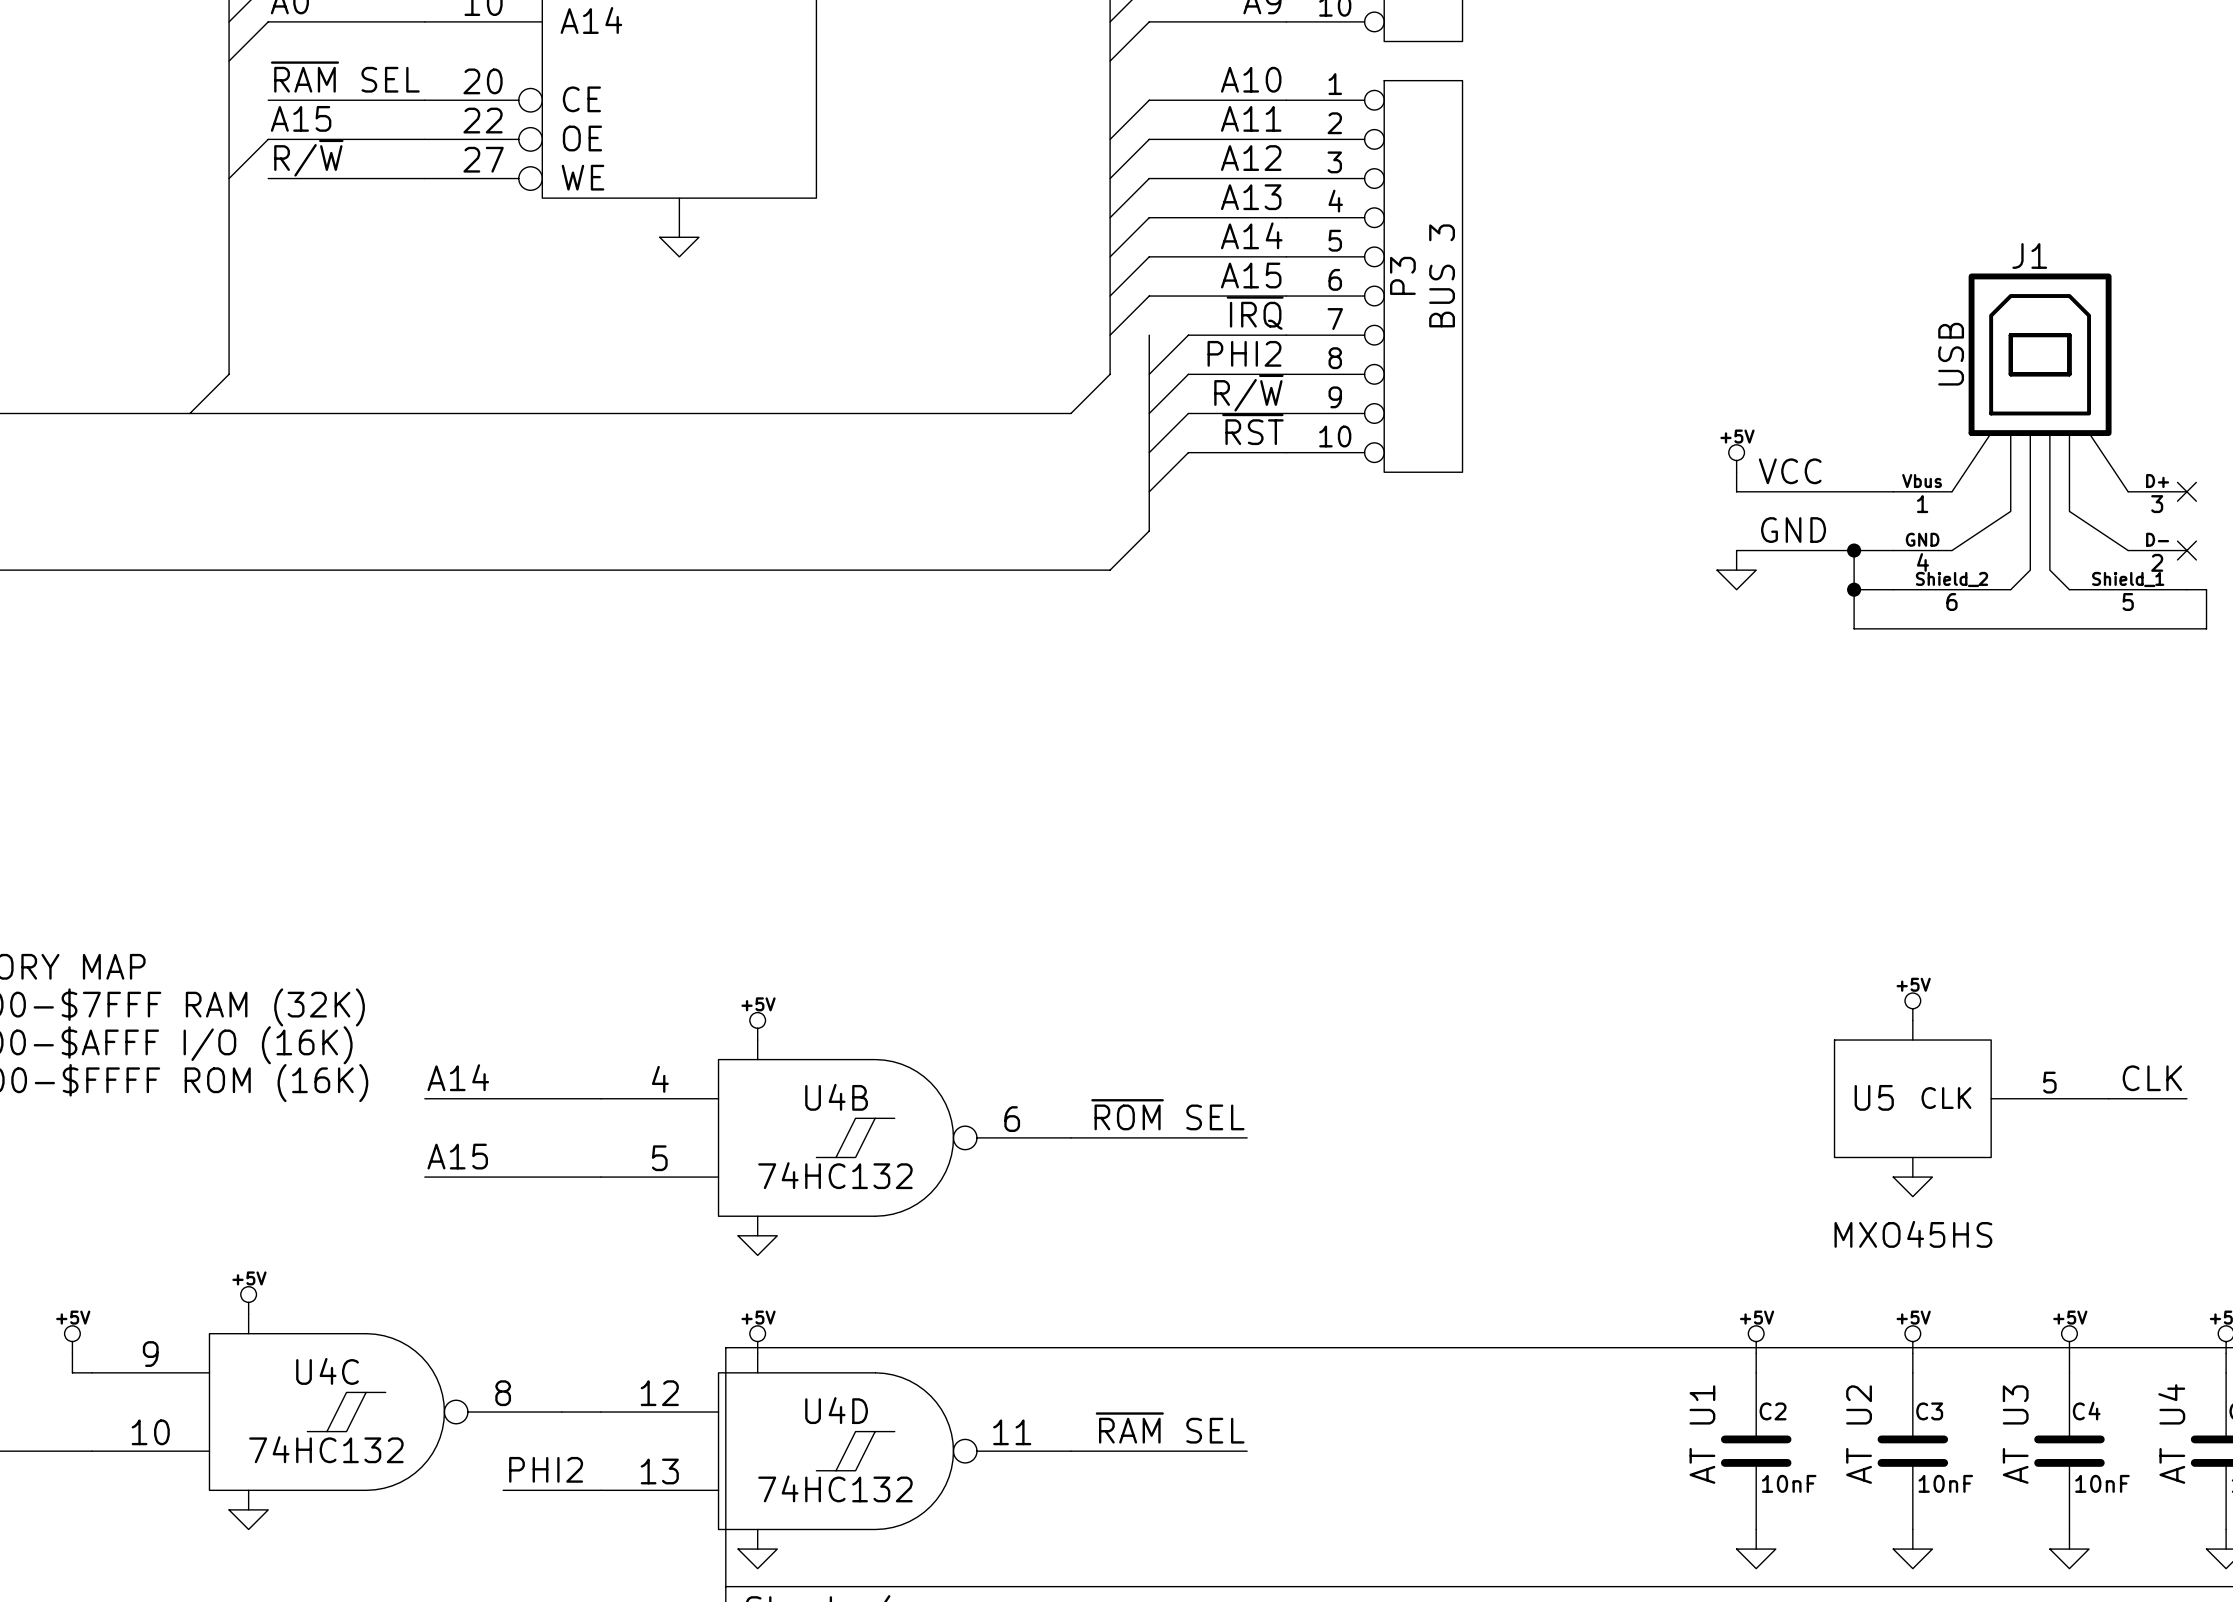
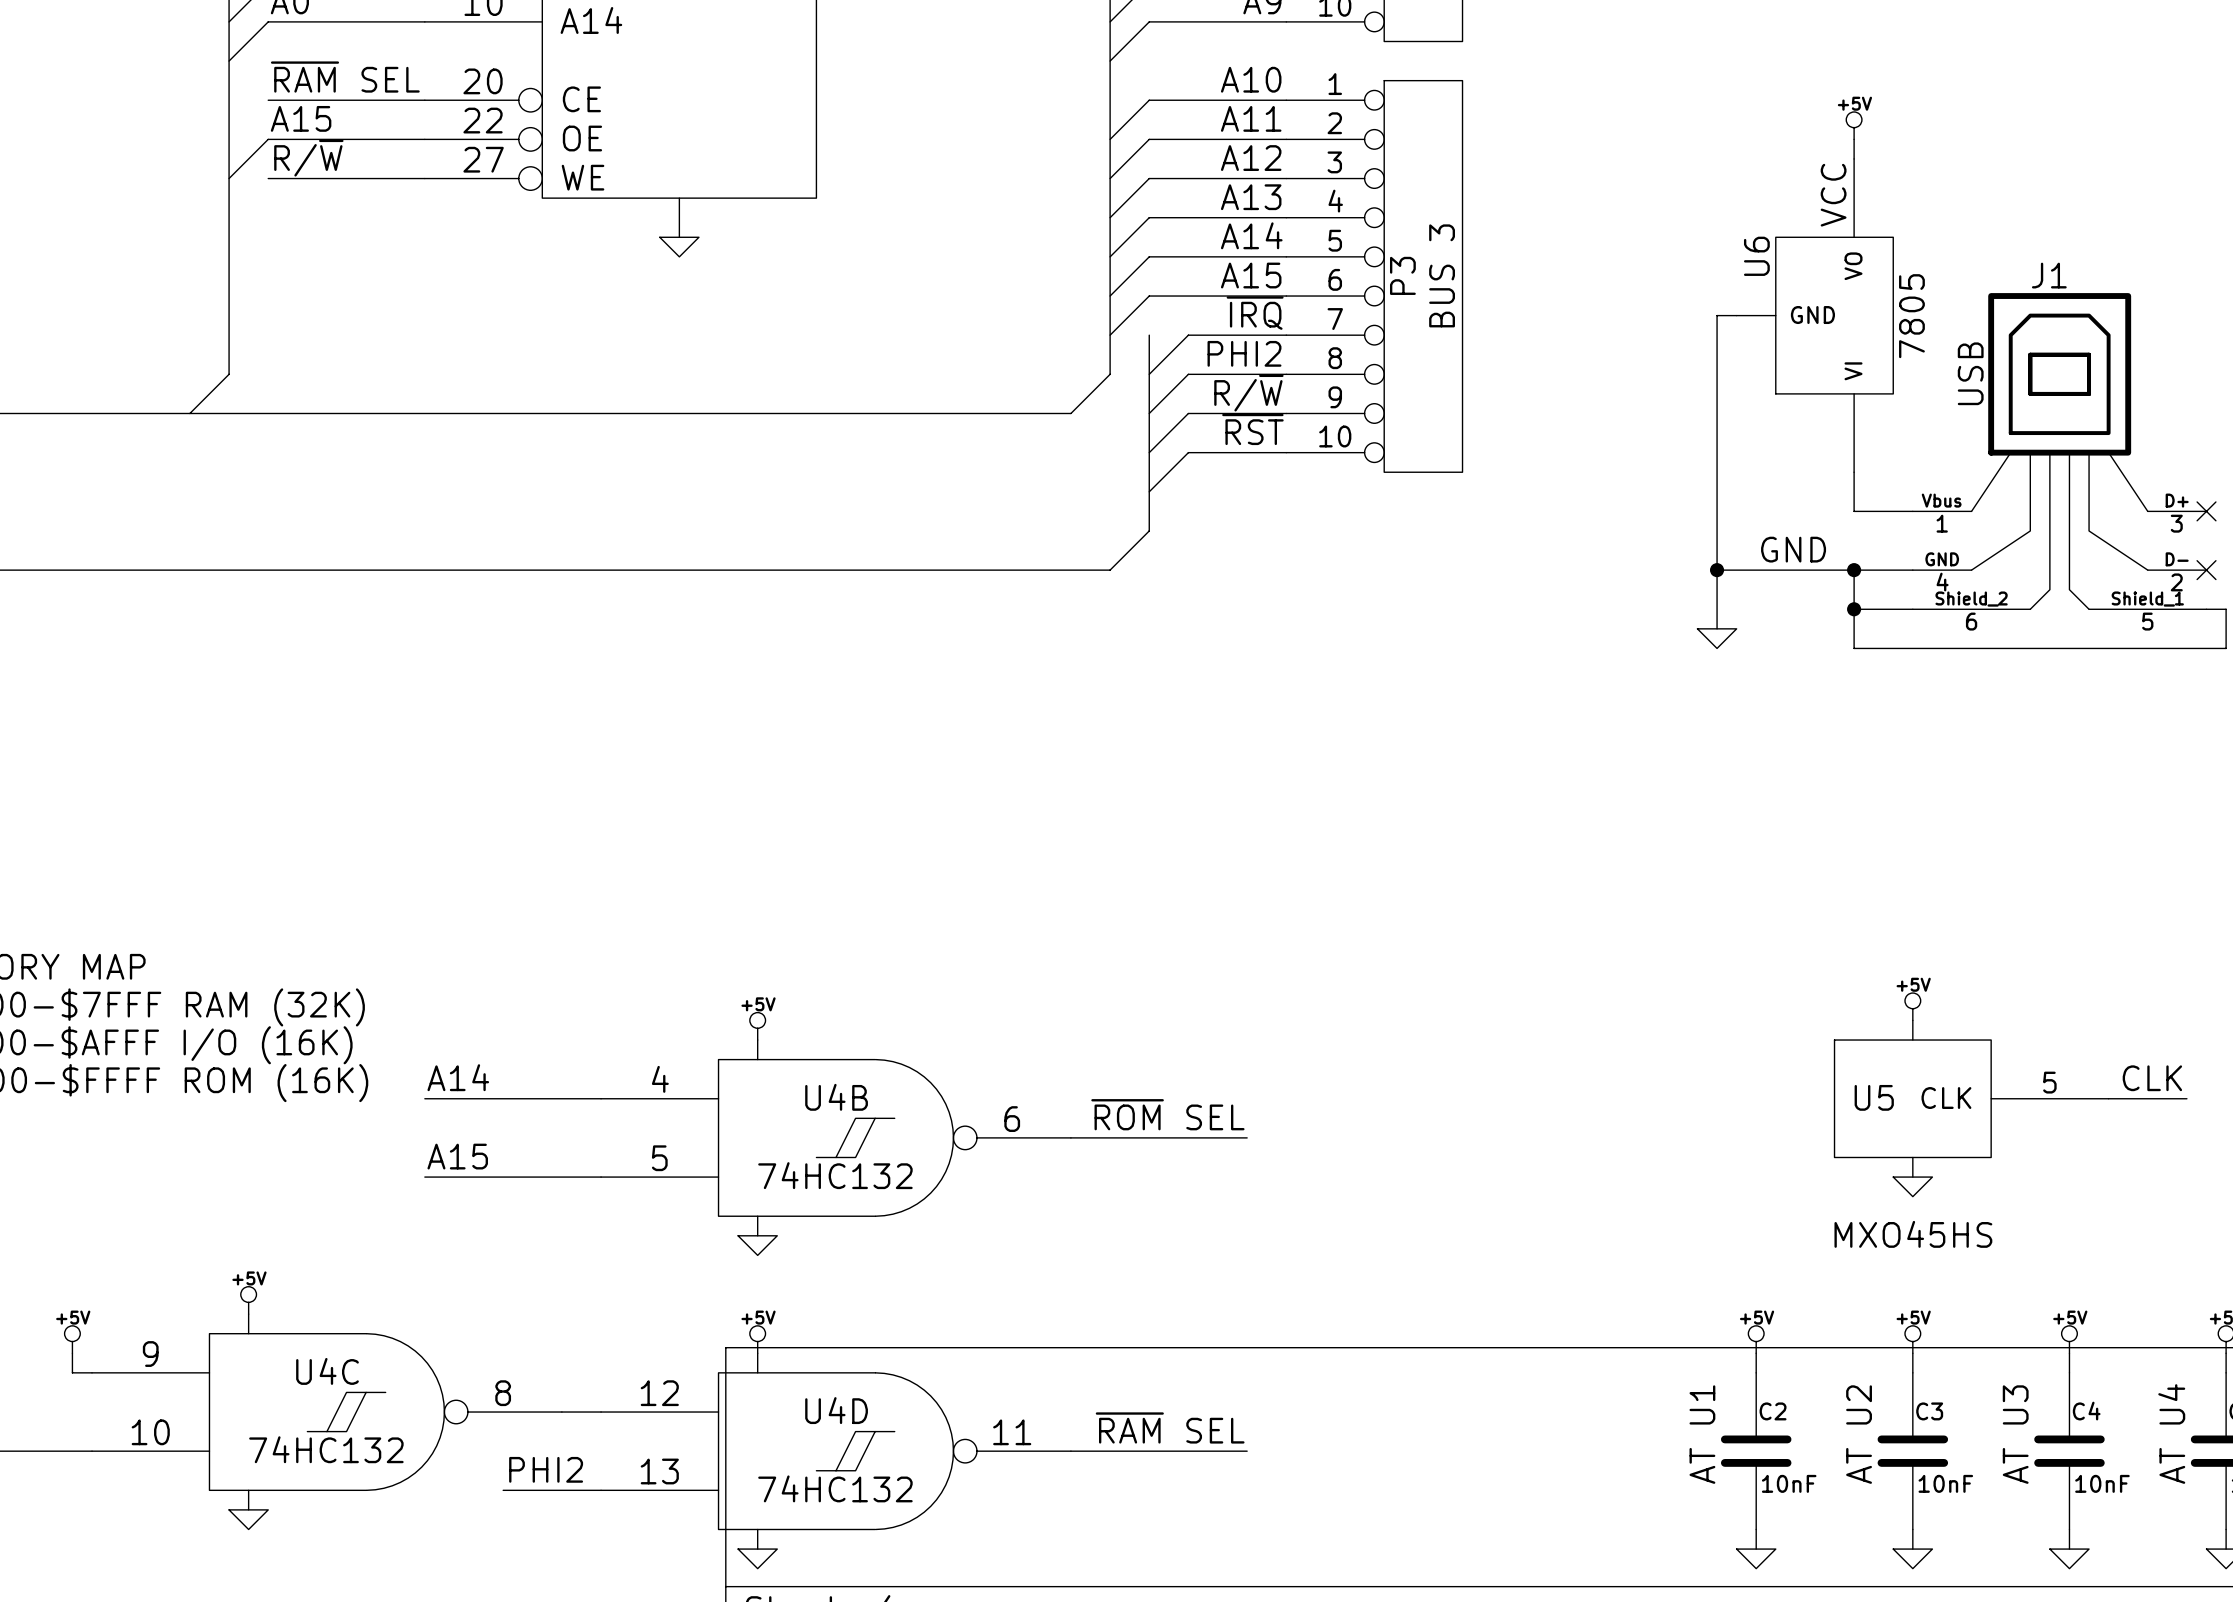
wire: none -> (1854, 139) (1854, 158)
wire: none -> (1736, 315) (1717, 315) (1717, 628)
U6: none -> 7805 (1814, 315)
J1 position: (2040, 431) -> (2059, 451)
power symbol position: +5V (1736, 458) -> +5V (1854, 125)
label rotation: 0° (1790, 471) -> 90° counterclockwise (1833, 195)
label position: VCC (1790, 471) -> VCC (1833, 195)
wire: (1736, 472) (1736, 491) (1893, 491) -> none
wire: none -> (1854, 472) (1854, 511) (1912, 511)
no-connect mark: (2186, 491) -> none
no-connect mark: none -> (2206, 511)
label position: GND (1793, 530) -> GND (1793, 549)
wire: (1854, 550) (1854, 570) -> none
junction: (1854, 550) -> none
wire: (1893, 550) (1736, 550) (1736, 570) -> none
no-connect mark: (2186, 550) -> none
wire: none -> (1717, 570) (1912, 570)
junction: none -> (1717, 570)
junction: none -> (1854, 570)
no-connect mark: none -> (2206, 570)
power symbol position: (1736, 579) -> (1717, 638)
wire: (1854, 589) (1893, 589) -> none
junction: (1854, 589) -> none
wire: (2186, 589) (2206, 589) (2206, 628) (1854, 628) -> (2206, 609) (2226, 609) (2226, 648) (1854, 648) (1854, 628)
wire: none -> (1854, 609) (1912, 609)
junction: none -> (1854, 609)

